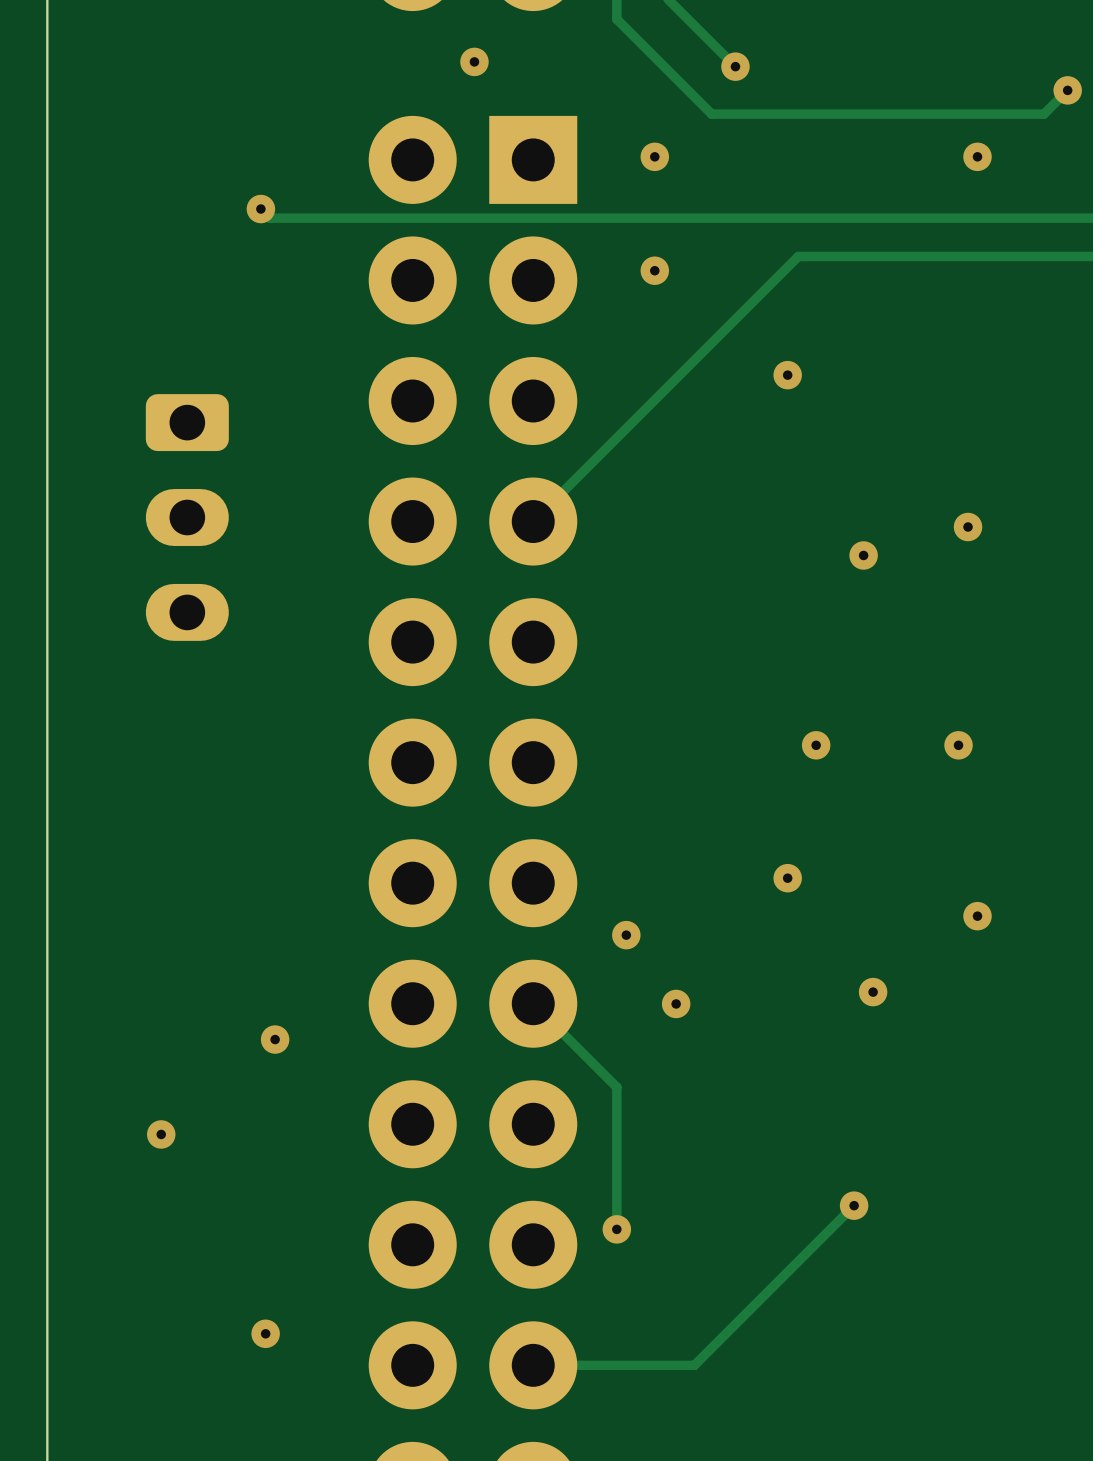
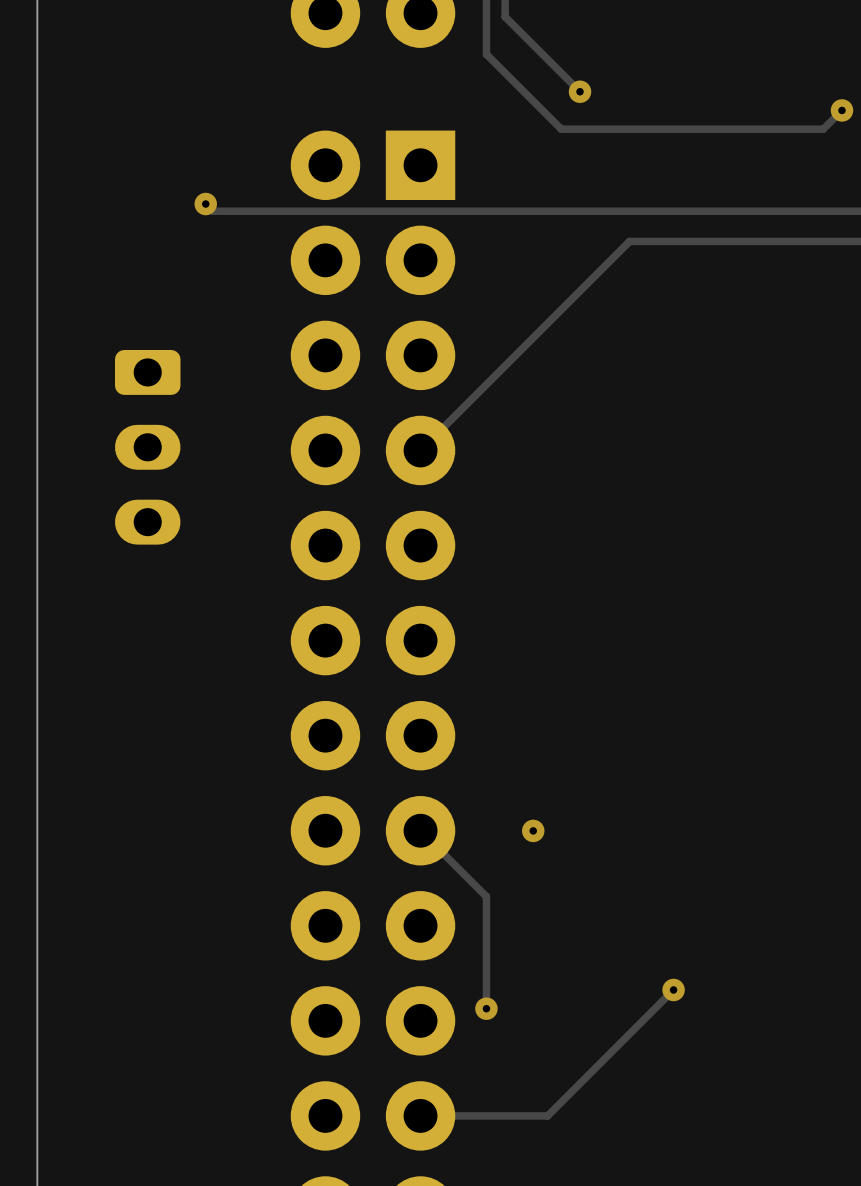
via: (474, 61) -> none
via: (654, 156) -> none
via: (977, 156) -> none
via: (654, 270) -> none
via: (787, 375) -> none
via: (968, 527) -> none
via: (863, 555) -> none
via: (816, 745) -> none
via: (958, 745) -> none
via: (787, 878) -> none
via: (977, 916) -> none
via: (626, 935) -> none
via: (873, 992) -> none
via: (275, 1039) -> none
via: (161, 1134) -> none
via: (265, 1333) -> none

